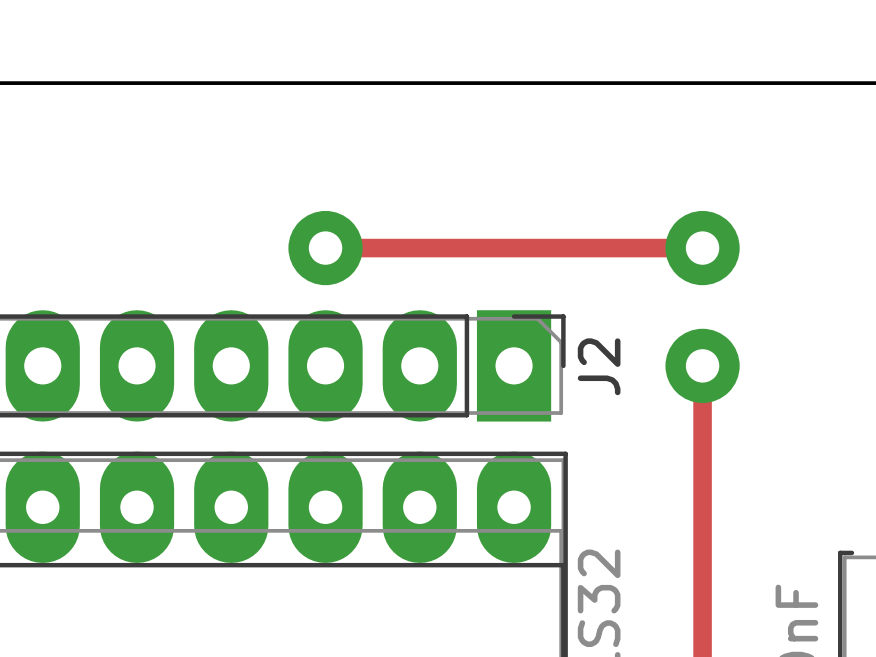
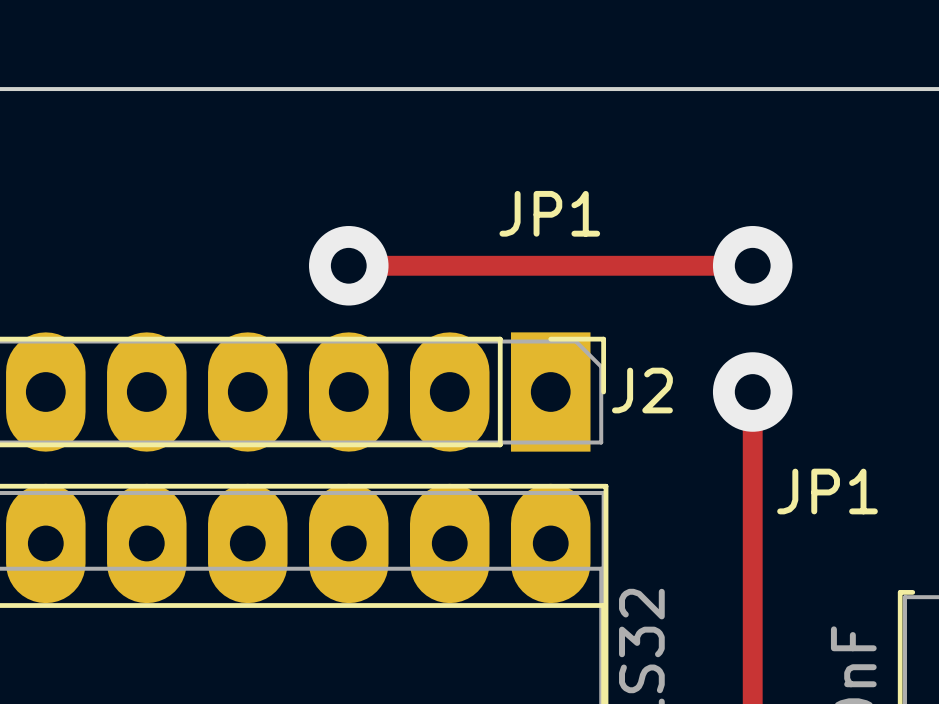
text: none -> JP1 (549, 213)
J2 name rotation: 0° (599, 366) -> 90° clockwise (642, 390)
text: none -> JP1 (827, 491)

